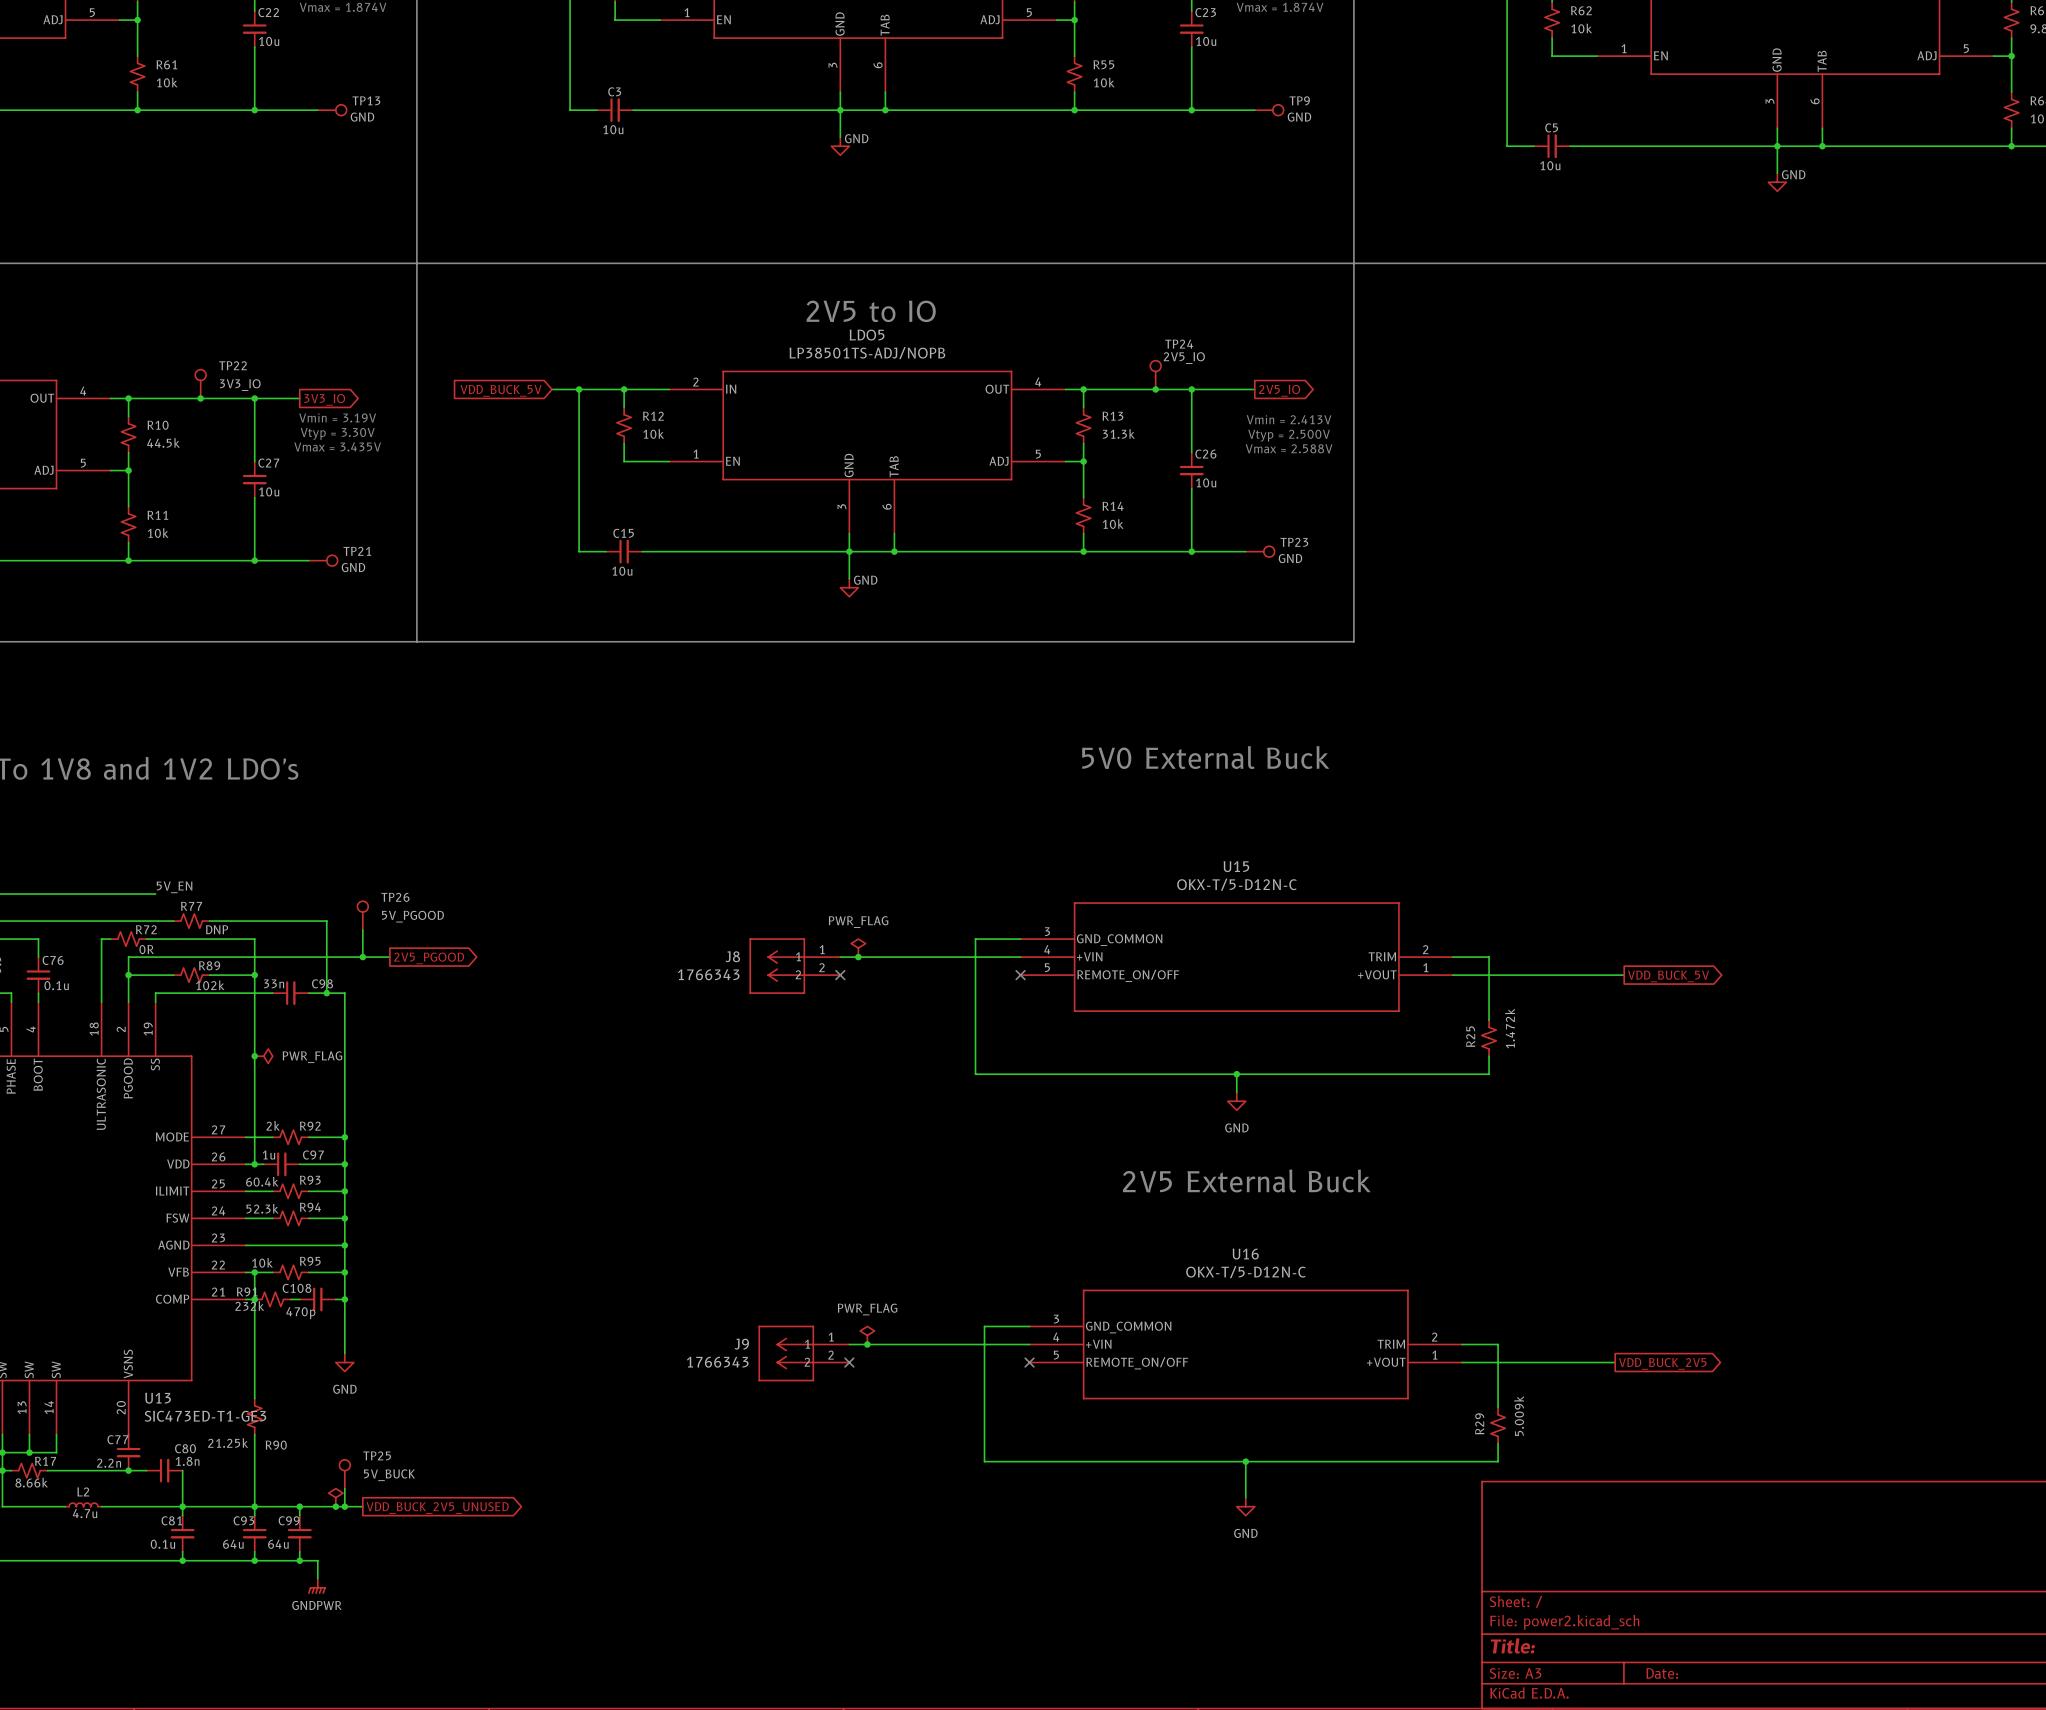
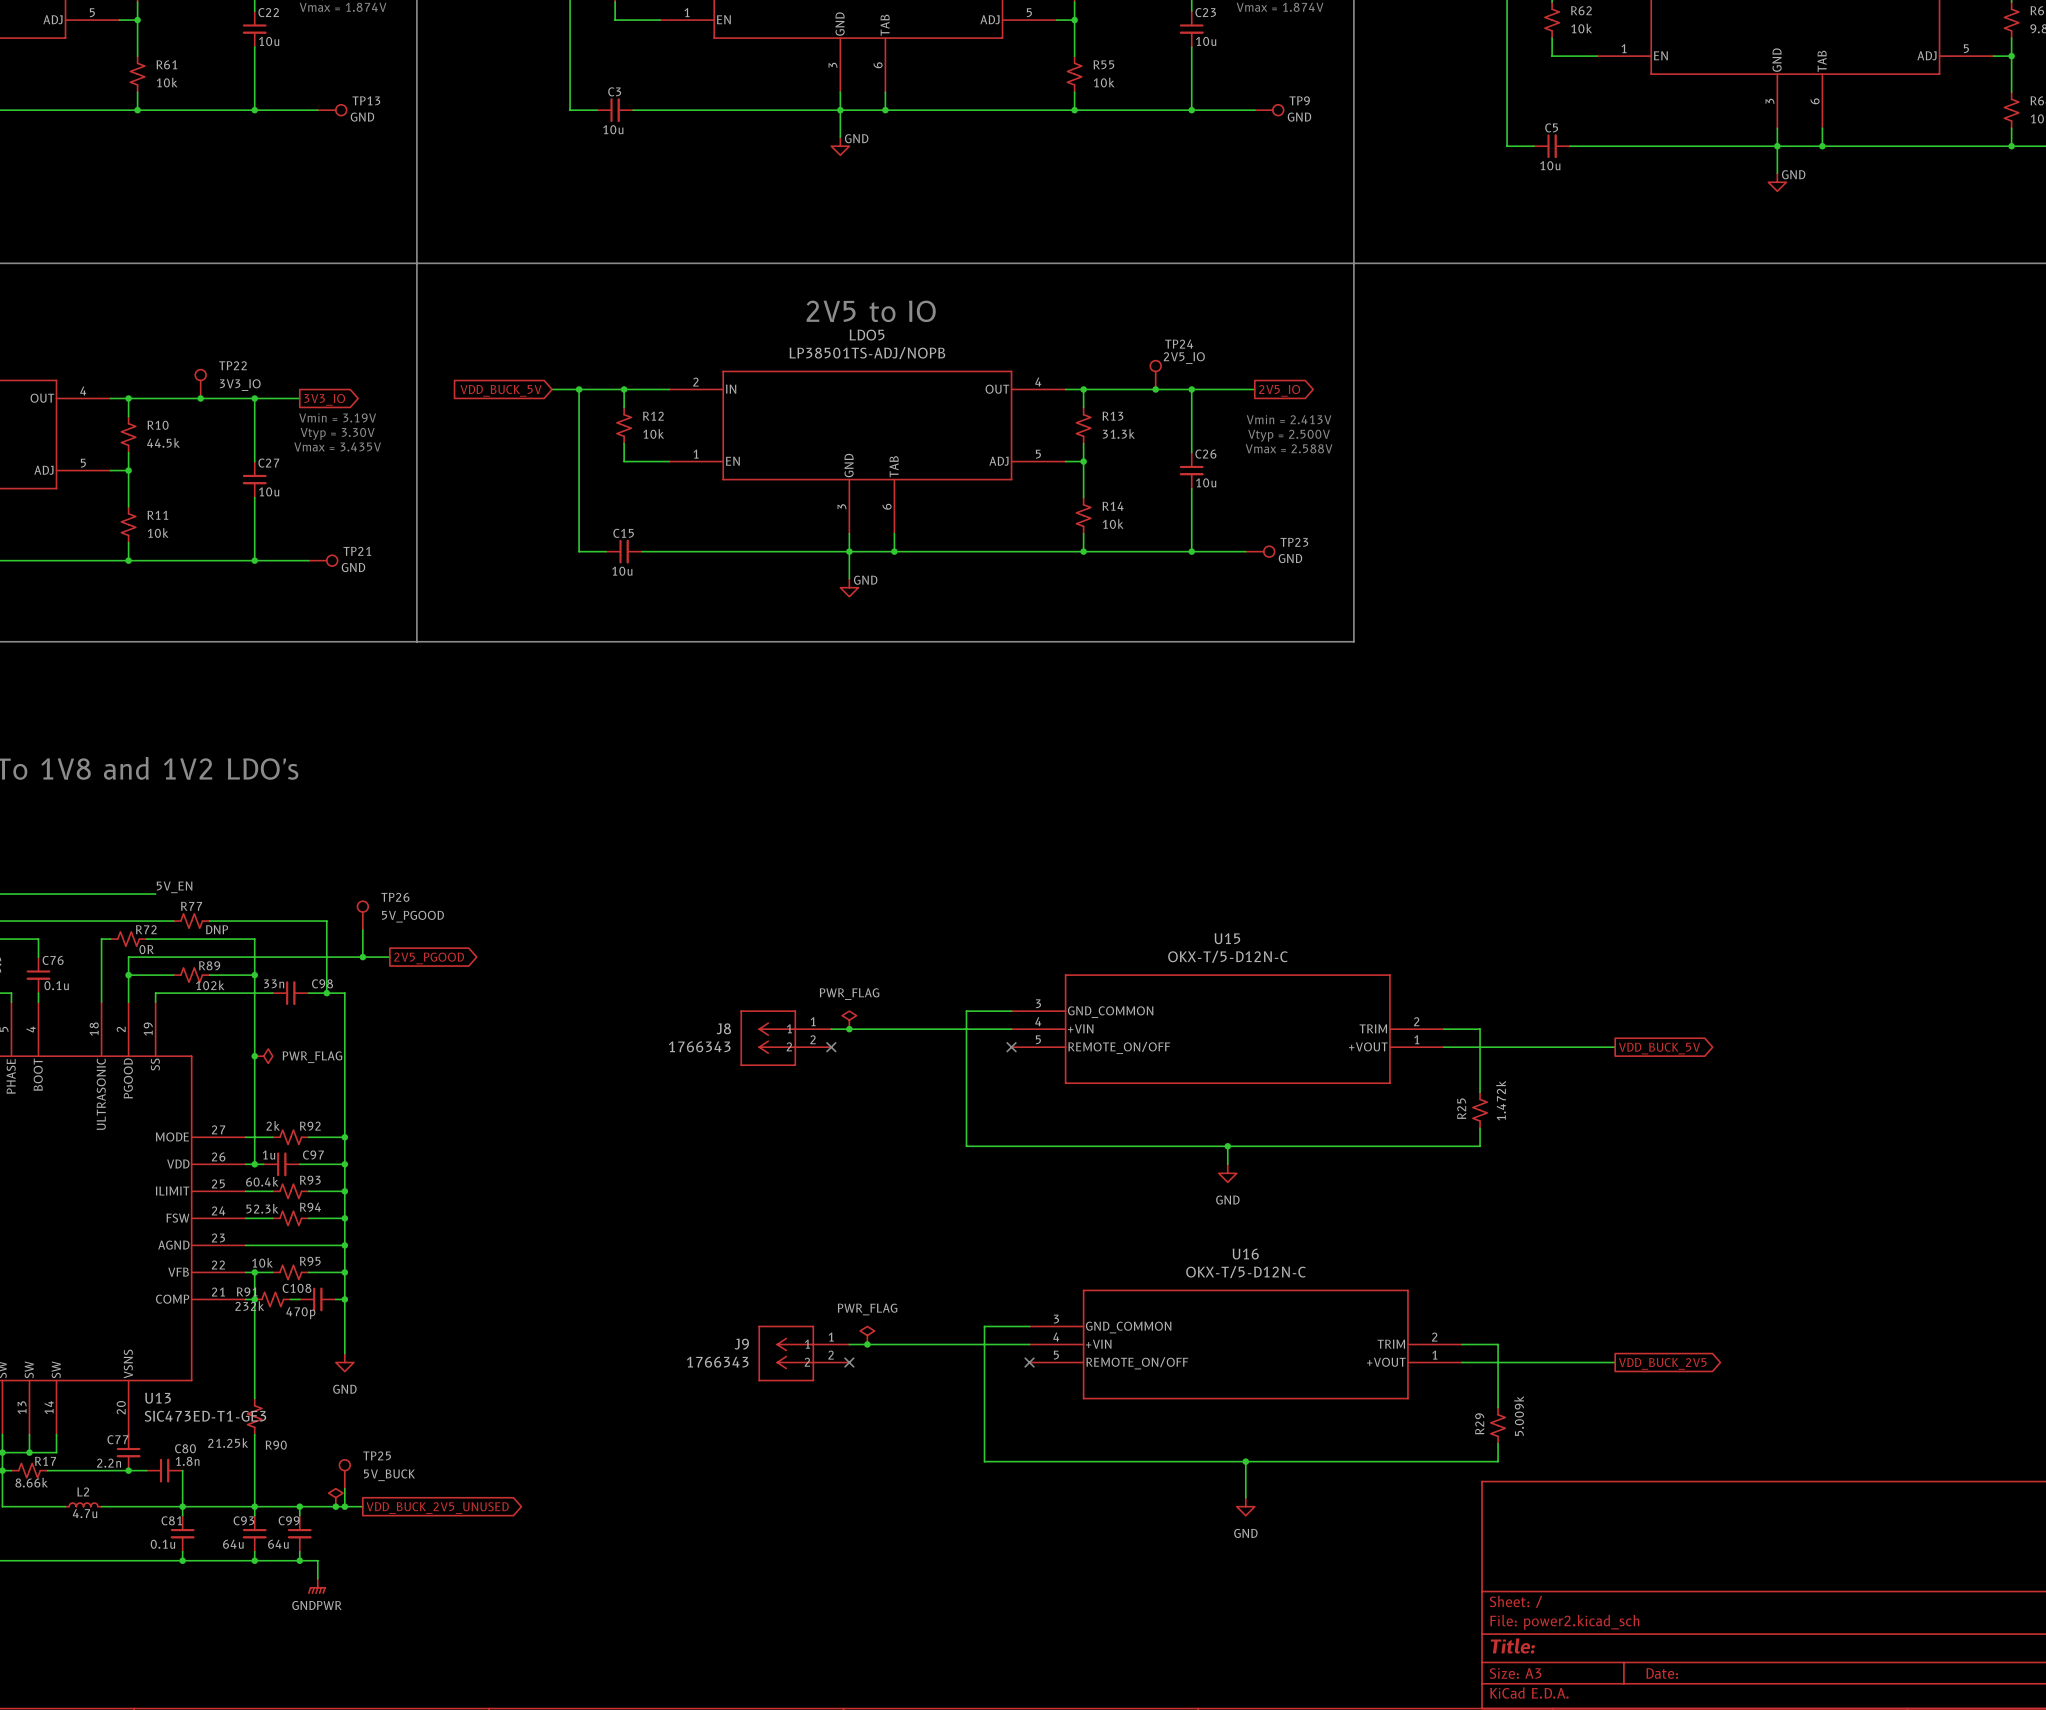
text: 5V0 External Buck (1205, 757) -> none
wire: (1020, 939) (975, 939) (975, 1074) (1489, 1074) (1489, 1056) -> (1011, 1011) (966, 1011) (966, 1146) (1480, 1146) (1480, 1128)
power symbol position: PWR_FLAG (858, 948) -> PWR_FLAG (849, 1020)
wire: (840, 957) (1020, 957) -> (831, 1029) (1011, 1029)
junction: (858, 957) -> none
U15 position: (1236, 957) -> (1227, 1029)
wire: (1453, 957) (1489, 957) (1489, 1020) -> (1444, 1029) (1480, 1029) (1480, 1092)
J8 position: (795, 966) -> (786, 1038)
no-connect mark: (840, 975) -> none
no-connect mark: (1020, 975) -> none
wire: (1453, 975) (1624, 975) -> (1444, 1047) (1615, 1047)
global label position: VDD_BUCK_5V (1668, 976) -> VDD_BUCK_5V (1659, 1048)
junction: none -> (849, 1029)
R25 position: (1489, 1038) -> (1480, 1110)
no-connect mark: none -> (831, 1047)
no-connect mark: none -> (1011, 1047)
wire: (1236, 1074) (1236, 1092) -> (1227, 1146) (1227, 1164)
junction: (1236, 1074) -> none
power symbol position: GND (1236, 1101) -> GND (1227, 1173)
junction: none -> (1227, 1146)
text: 2V5 External Buck (1246, 1181) -> none

